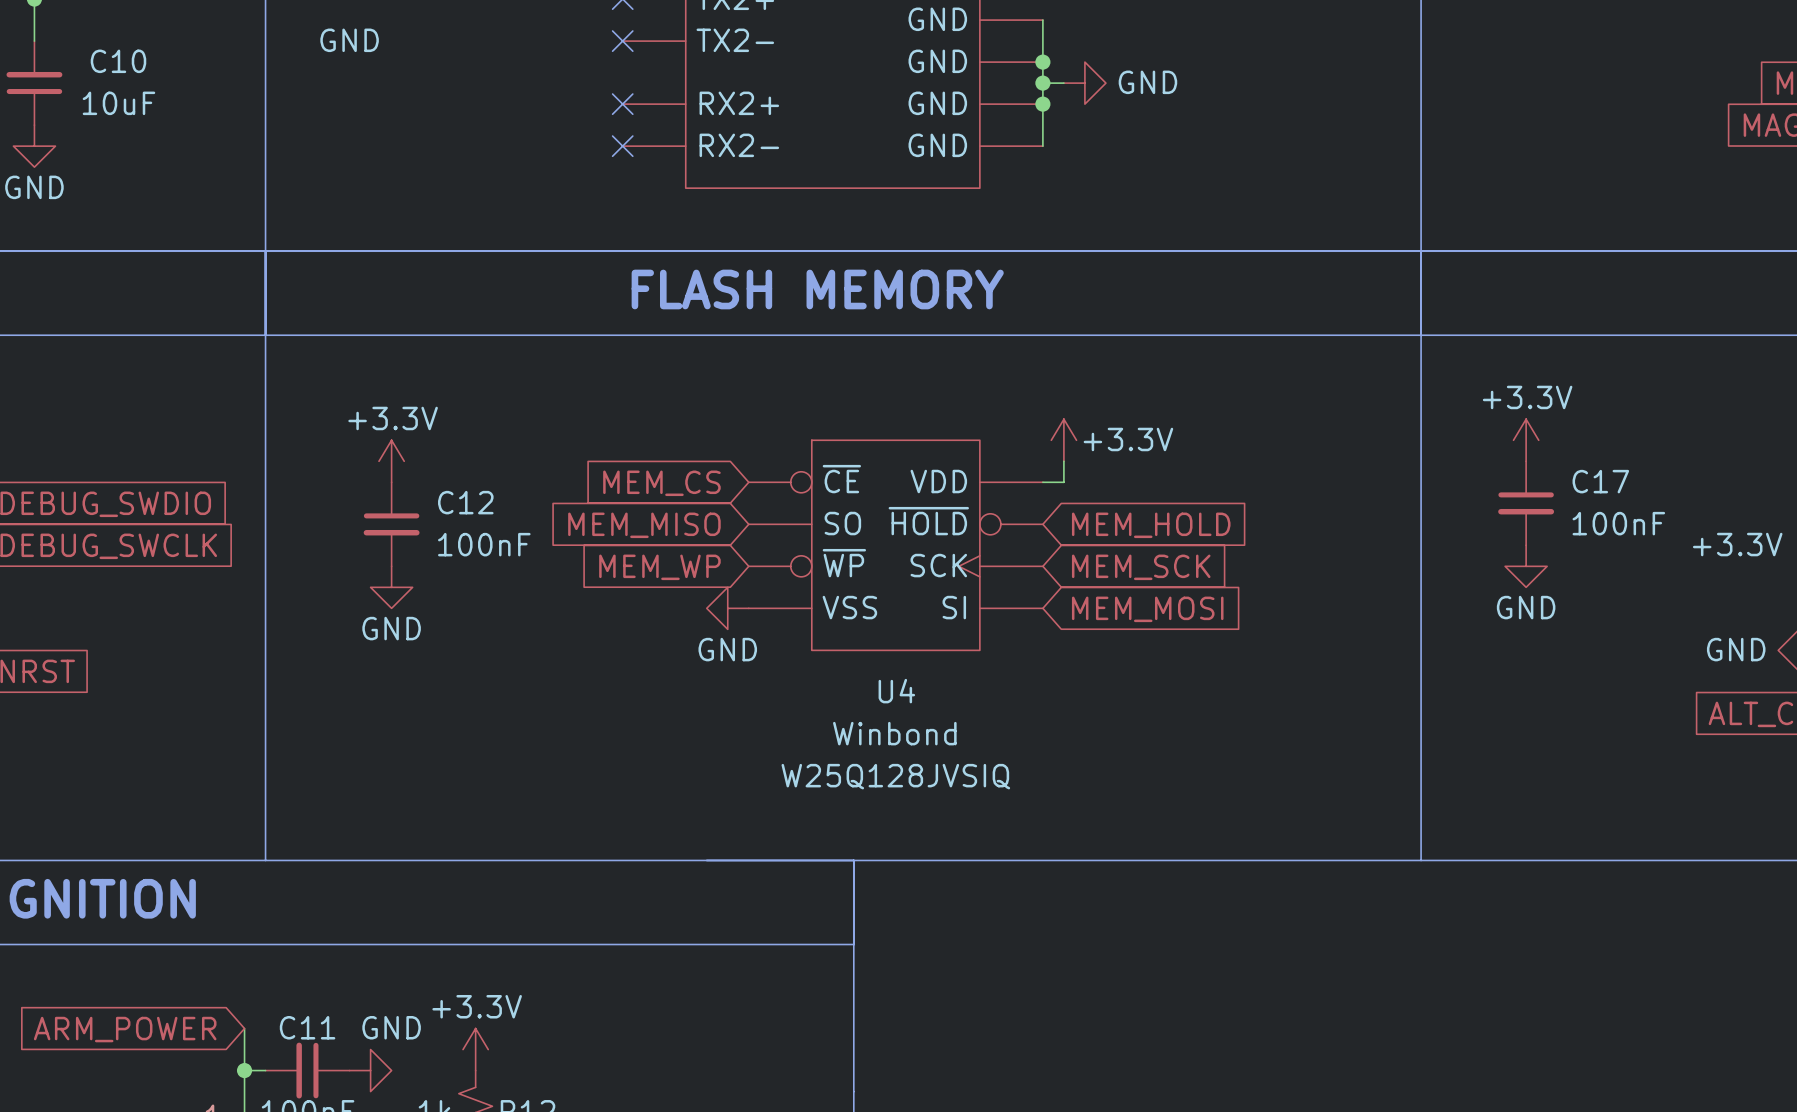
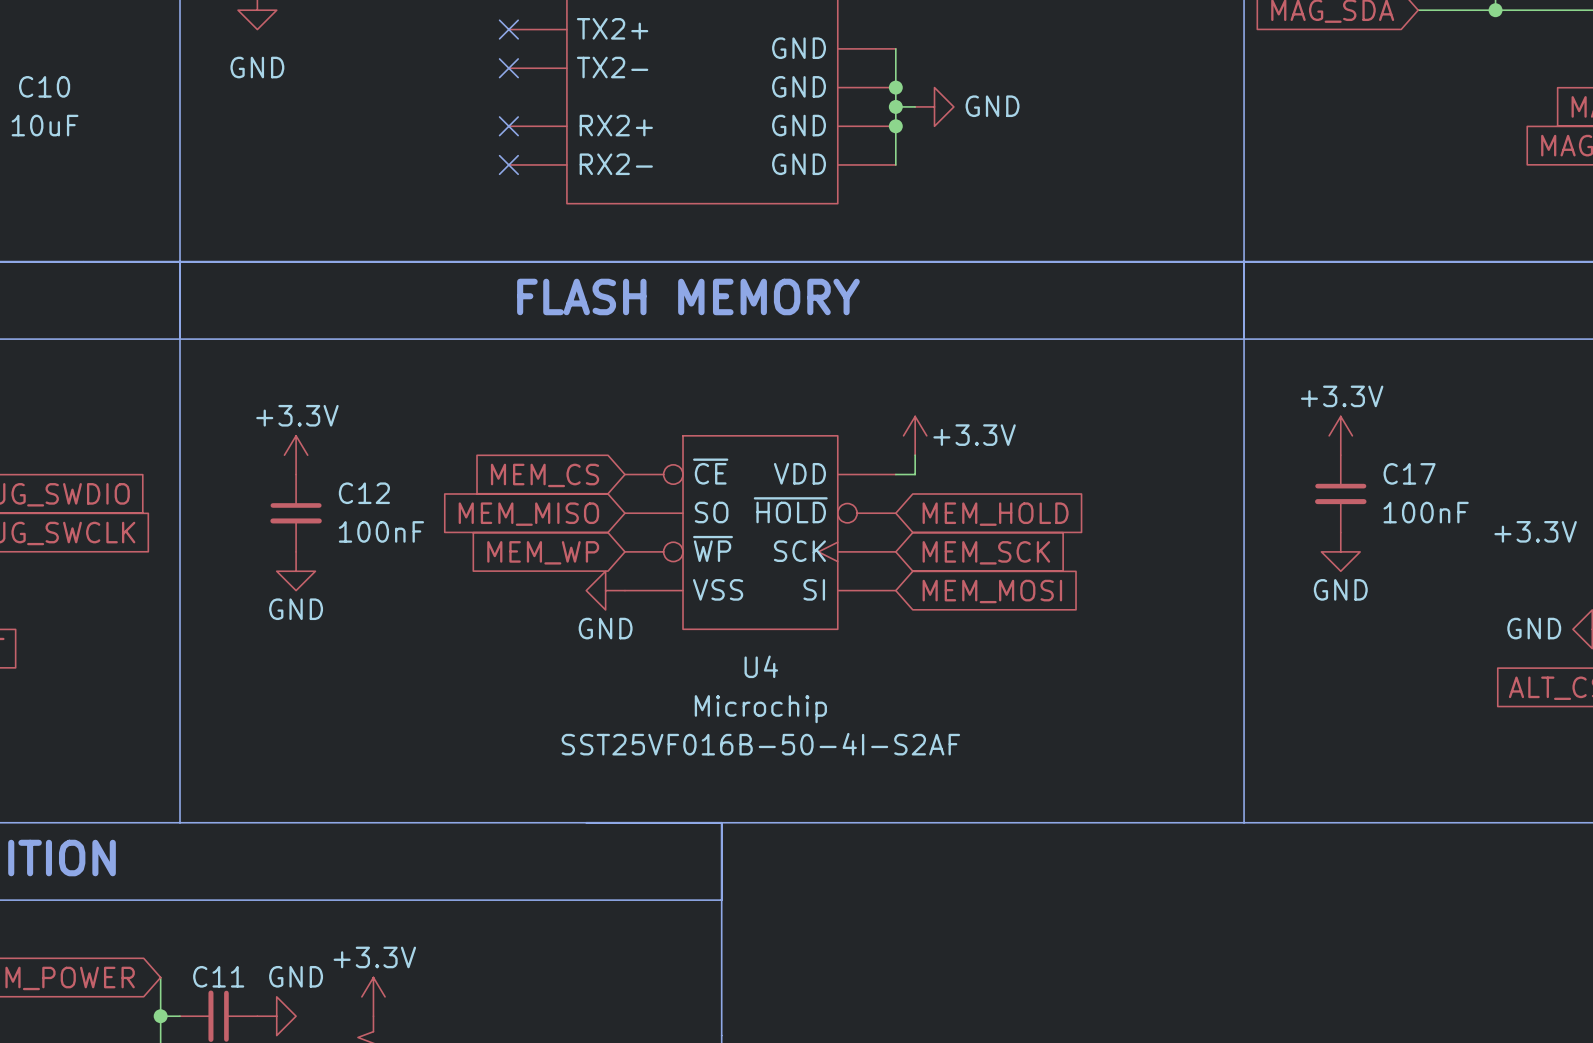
U4 text: Winbond (894, 733) -> Microchip (760, 709)
U4 text: W25Q128JVSIQ (895, 776) -> SST25VF016B-50-4I-S2AF (760, 744)

